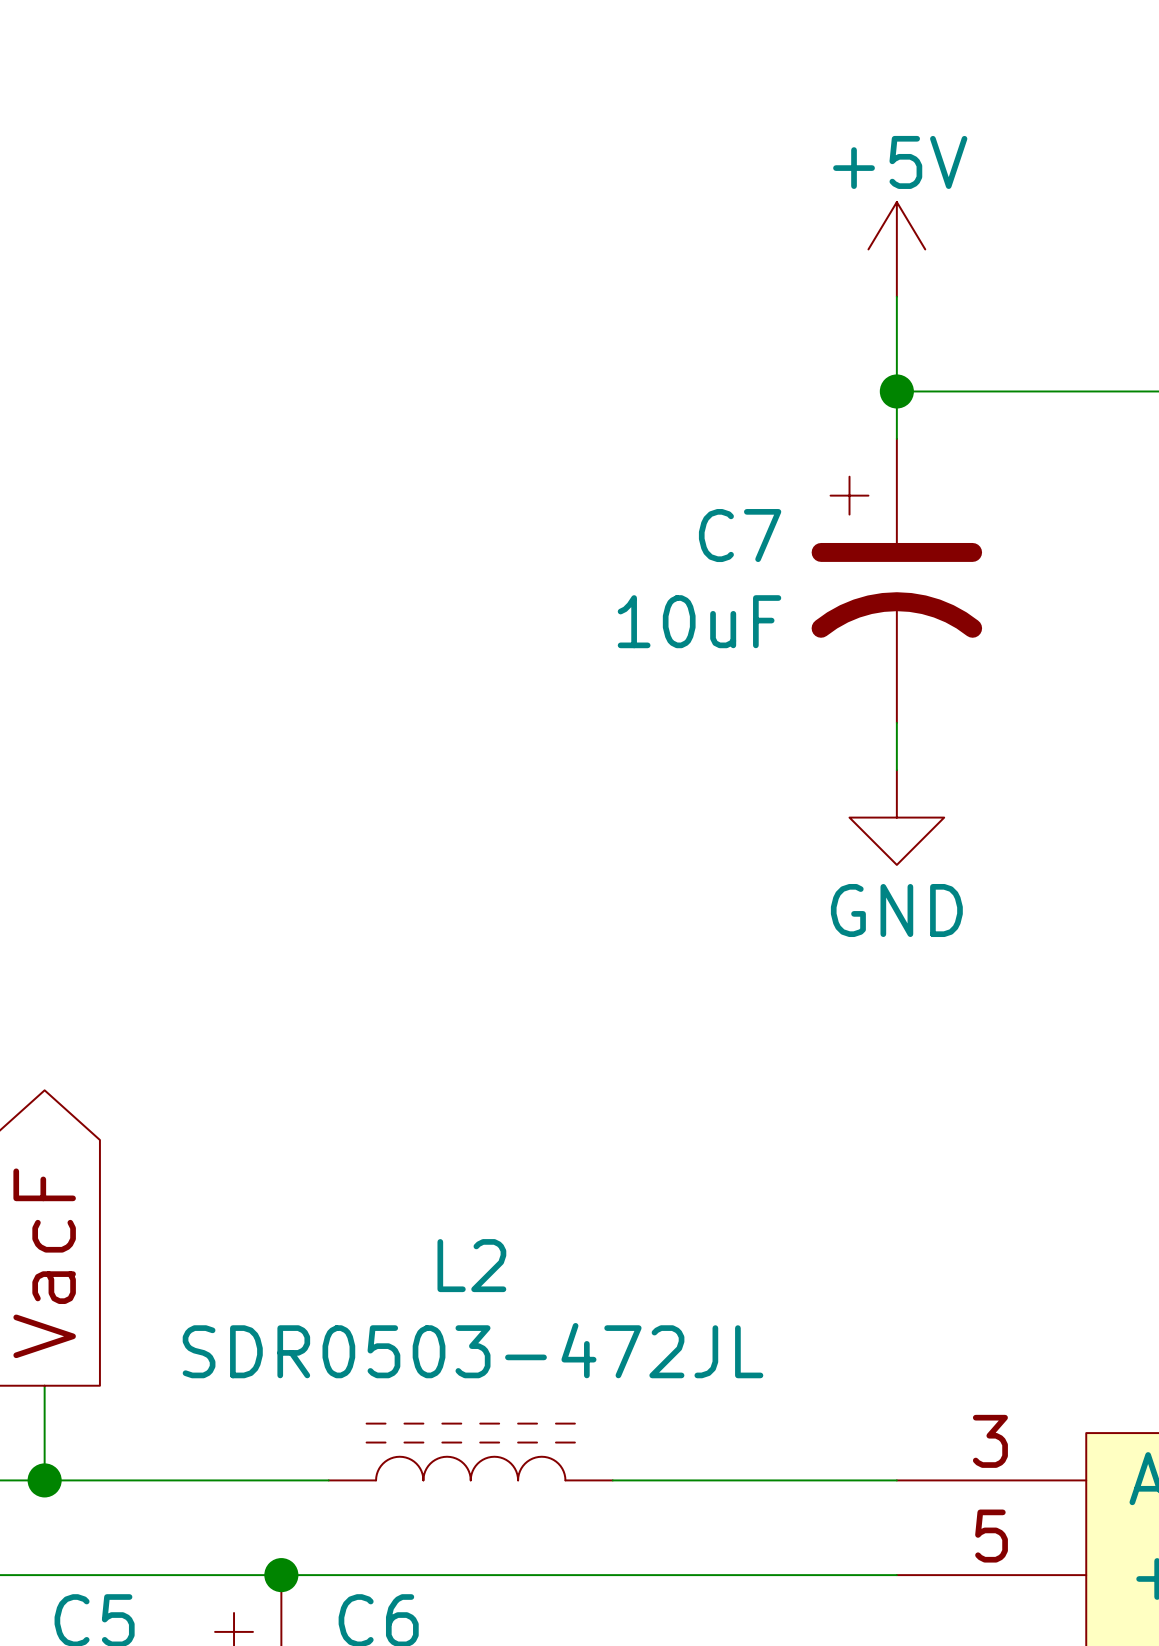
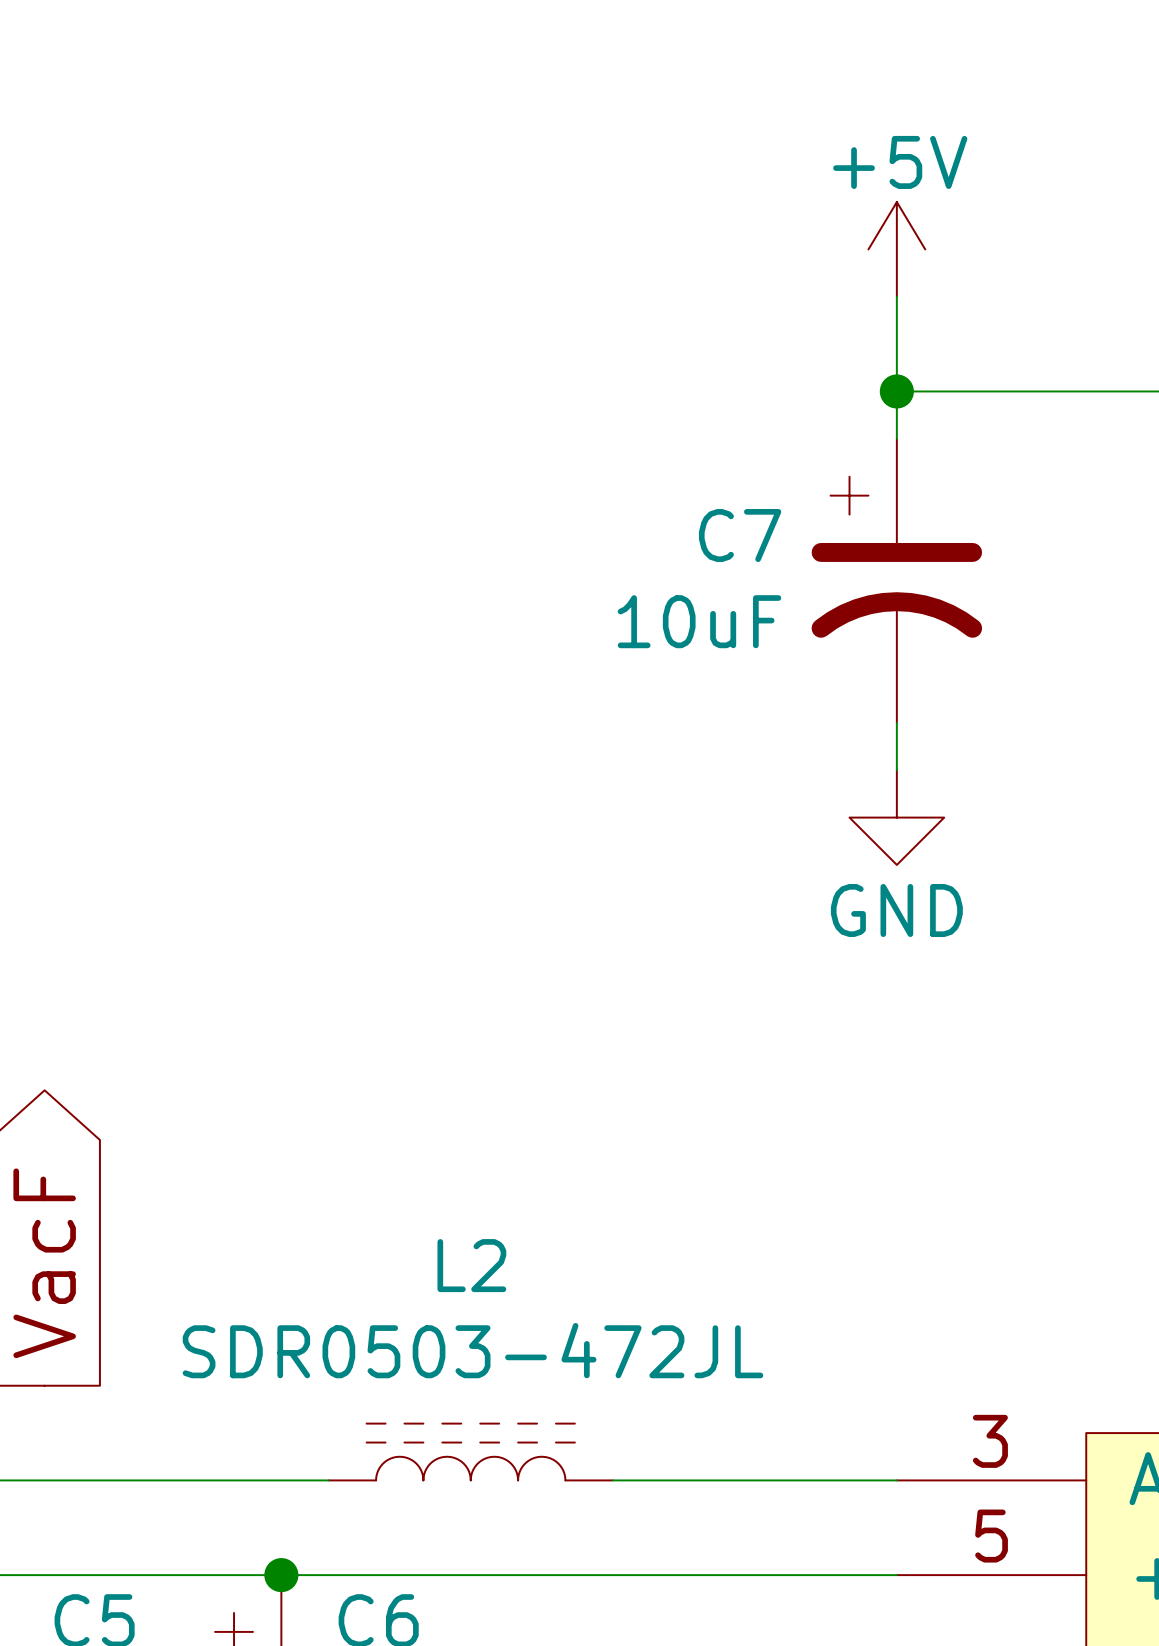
wire: (44, 1385) (44, 1480) -> none
junction: (44, 1480) -> none

